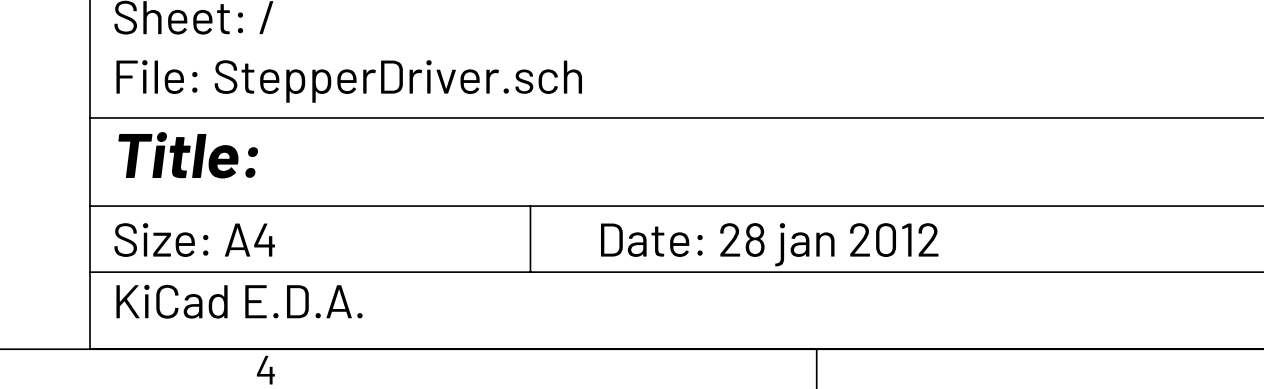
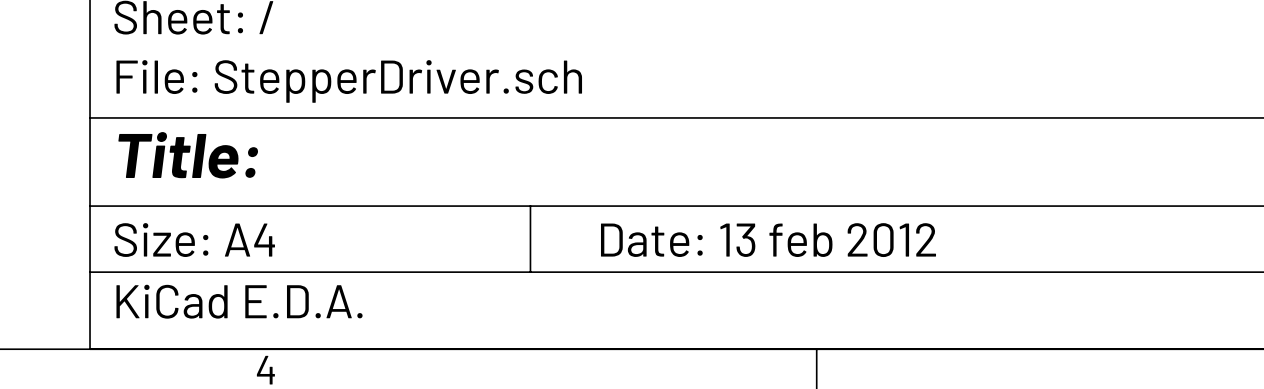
title block: Date: 28 jan 2012 (769, 244) -> Date: 13 feb 2012 (768, 240)

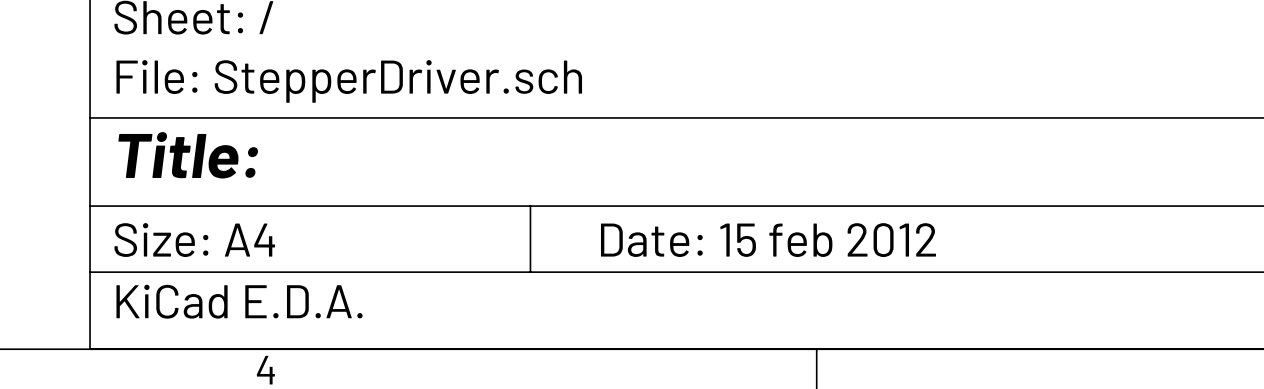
title block: Date: 13 feb 2012 (768, 240) -> Date: 15 feb 2012 (768, 240)

